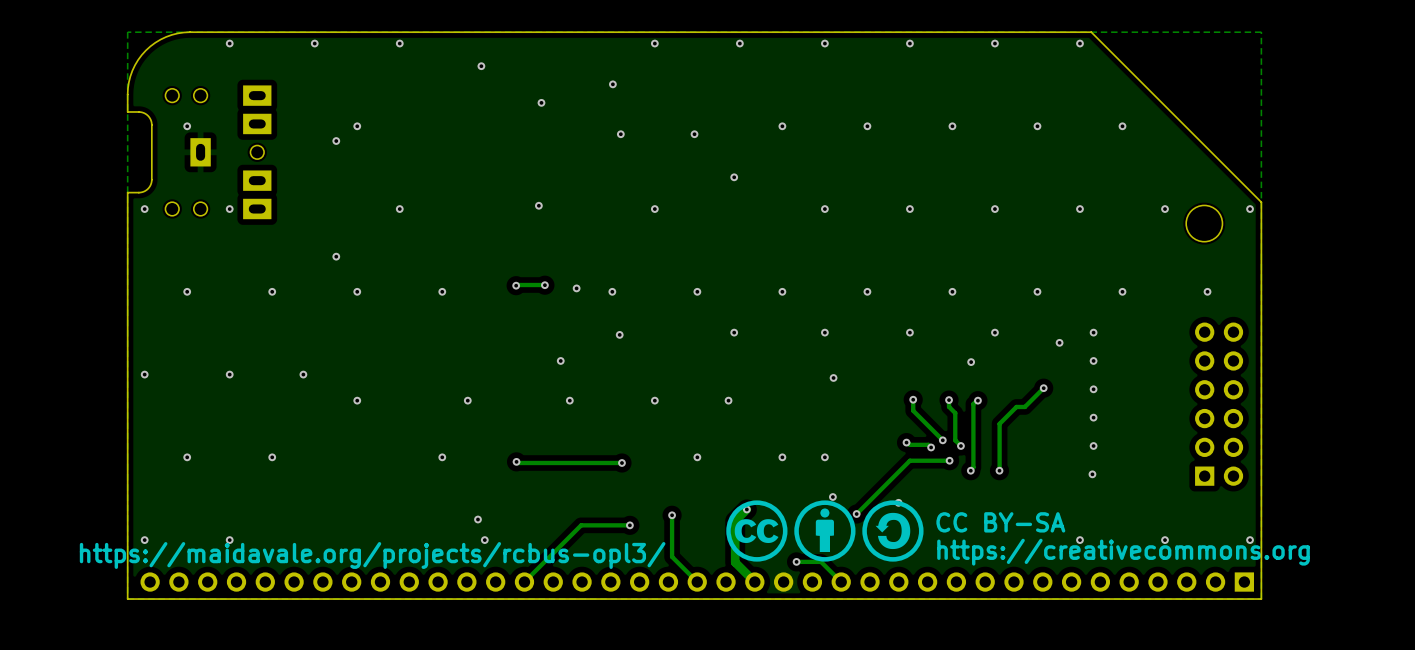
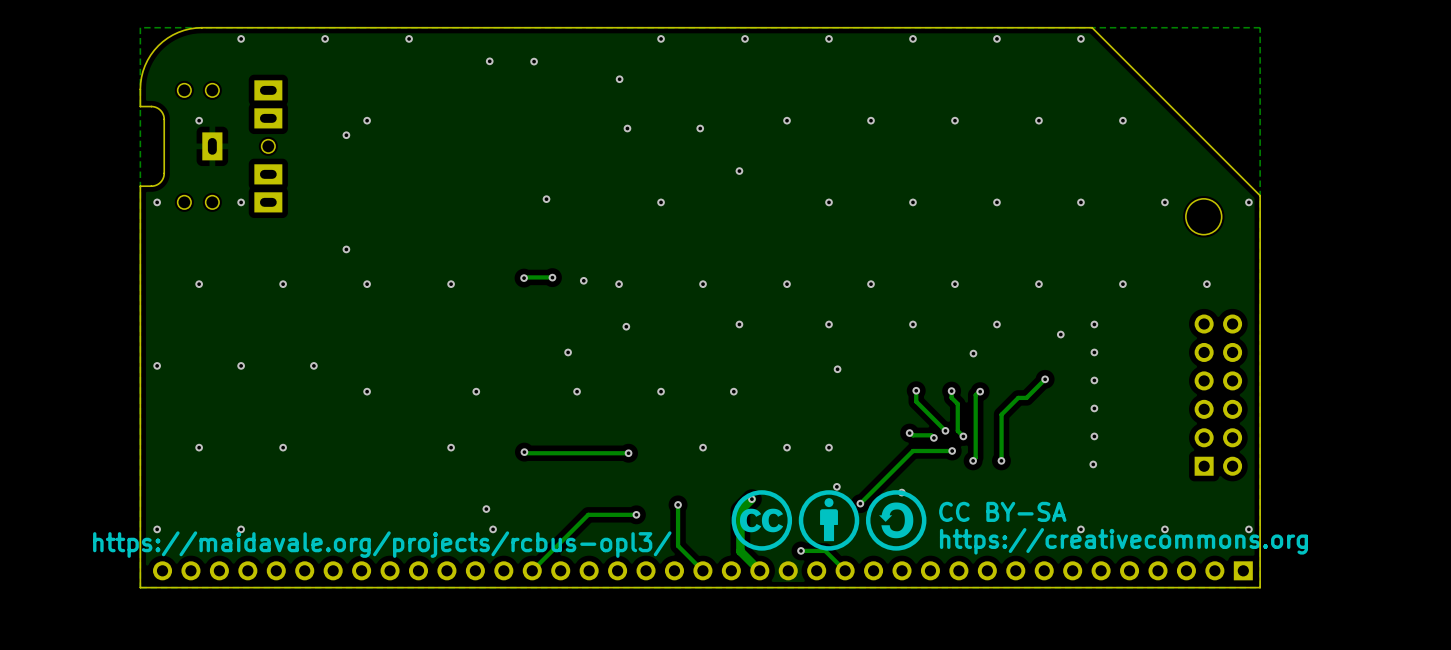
via position: (541, 102) -> (534, 61)
via: (399, 209) -> none

